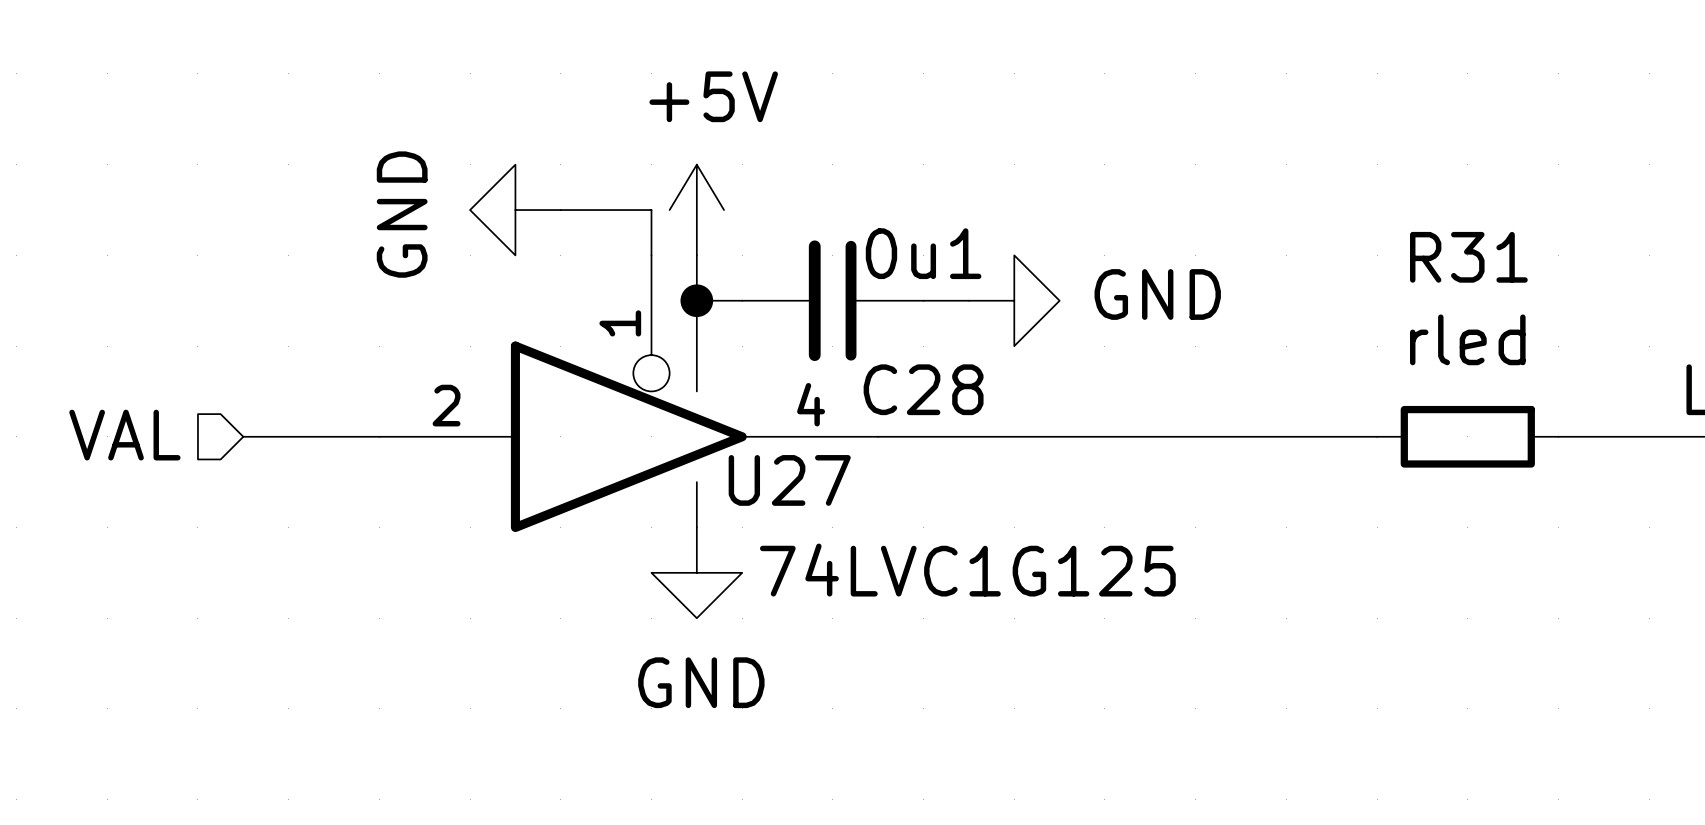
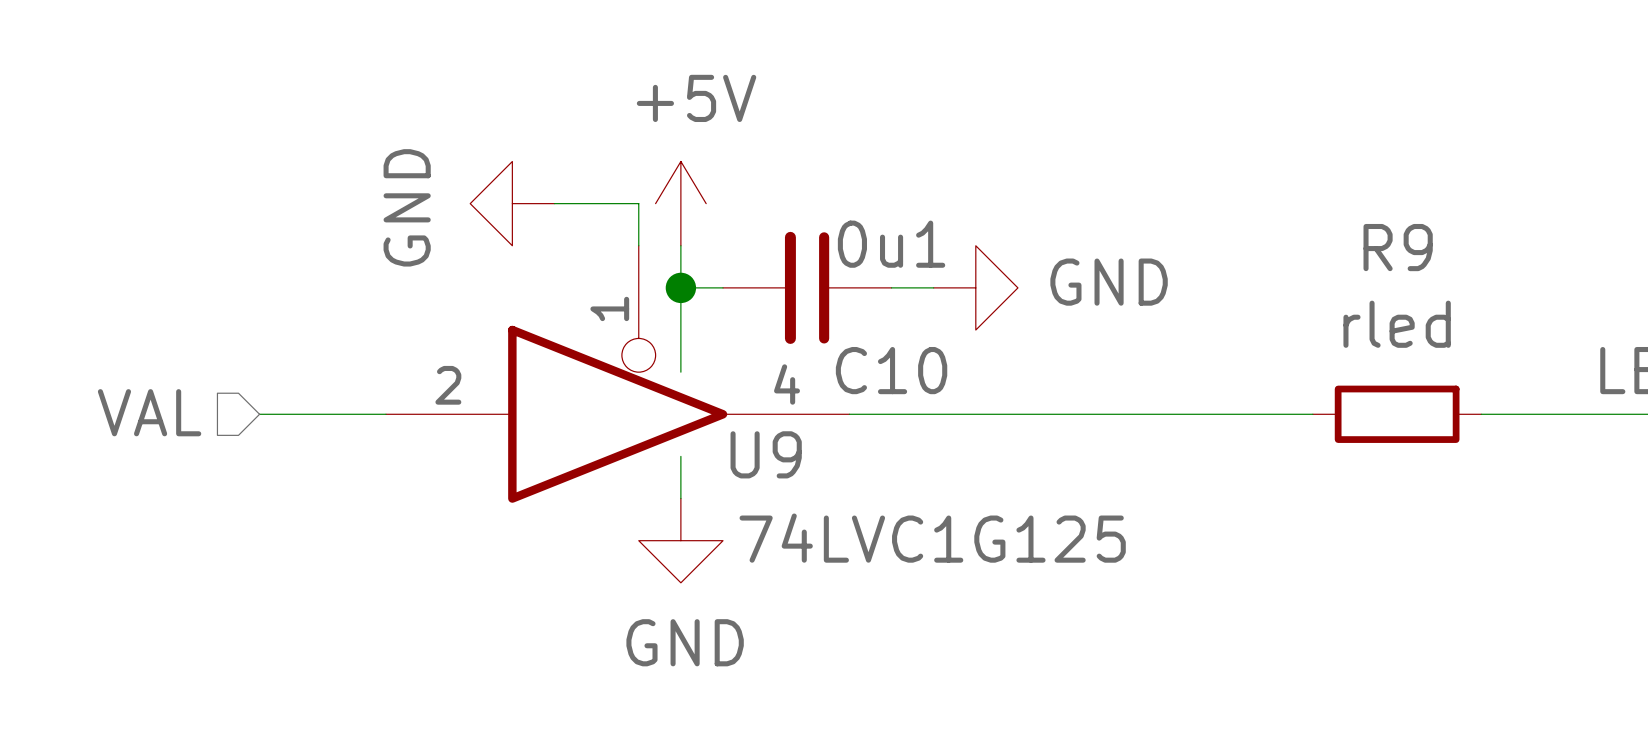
R31 name: R31 (1468, 257) -> R9 (1398, 247)
C28 name: C28 (923, 389) -> C10 (891, 370)
U27 name: U27 (789, 480) -> U9 (766, 454)

